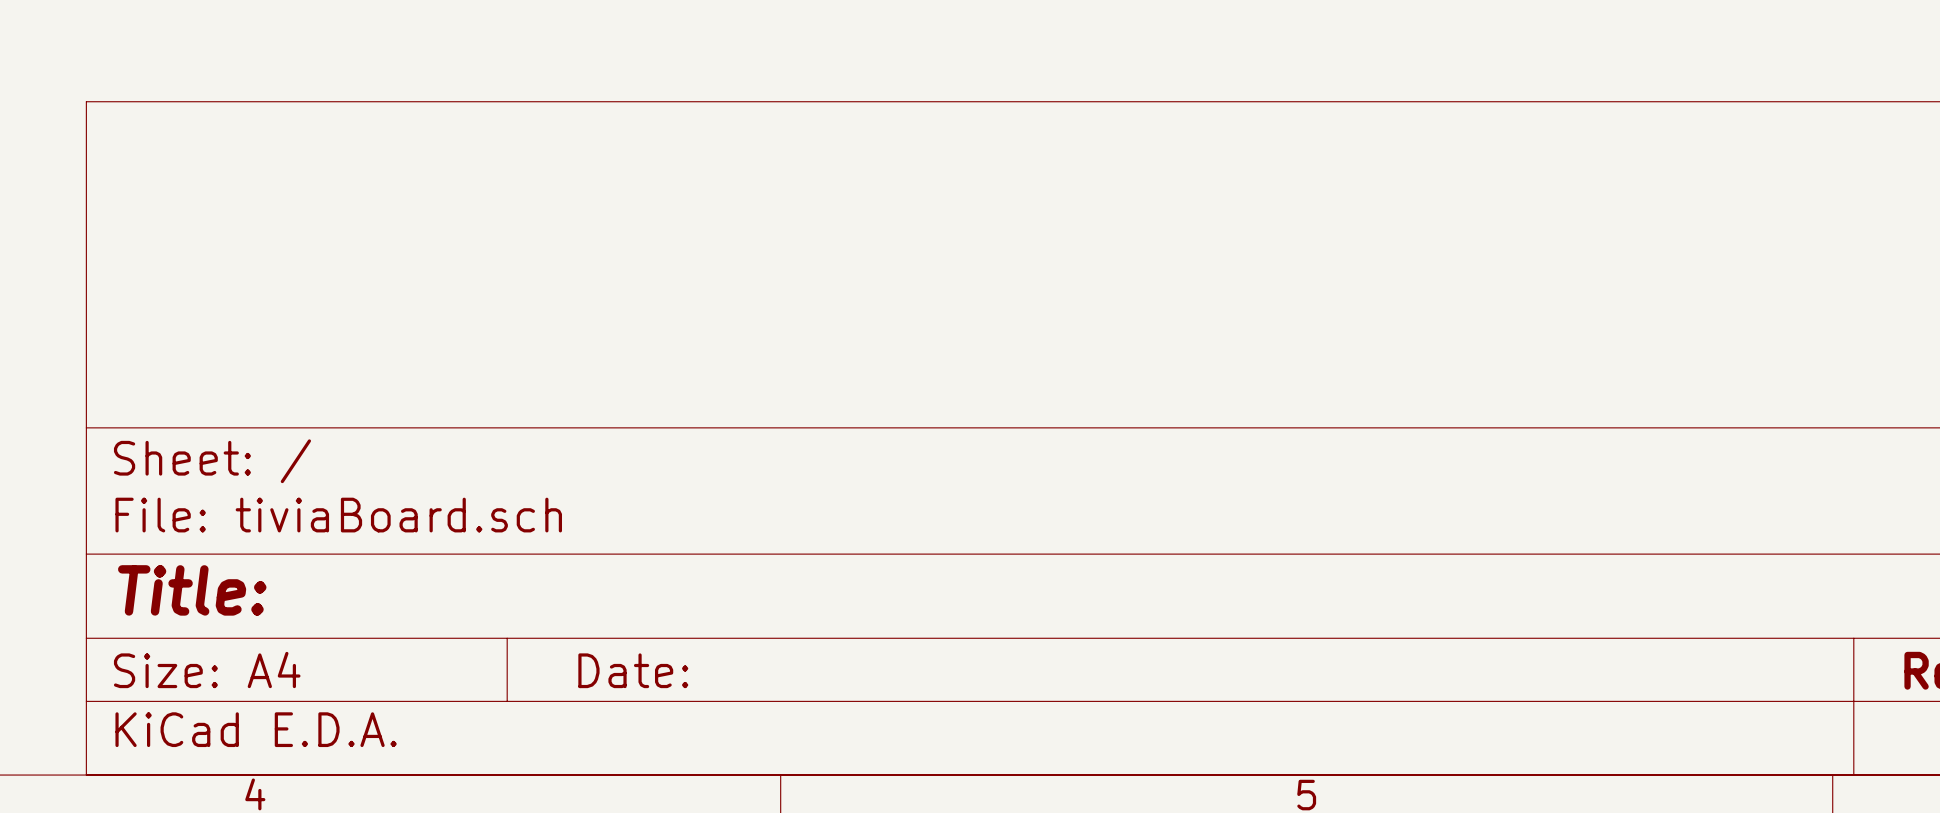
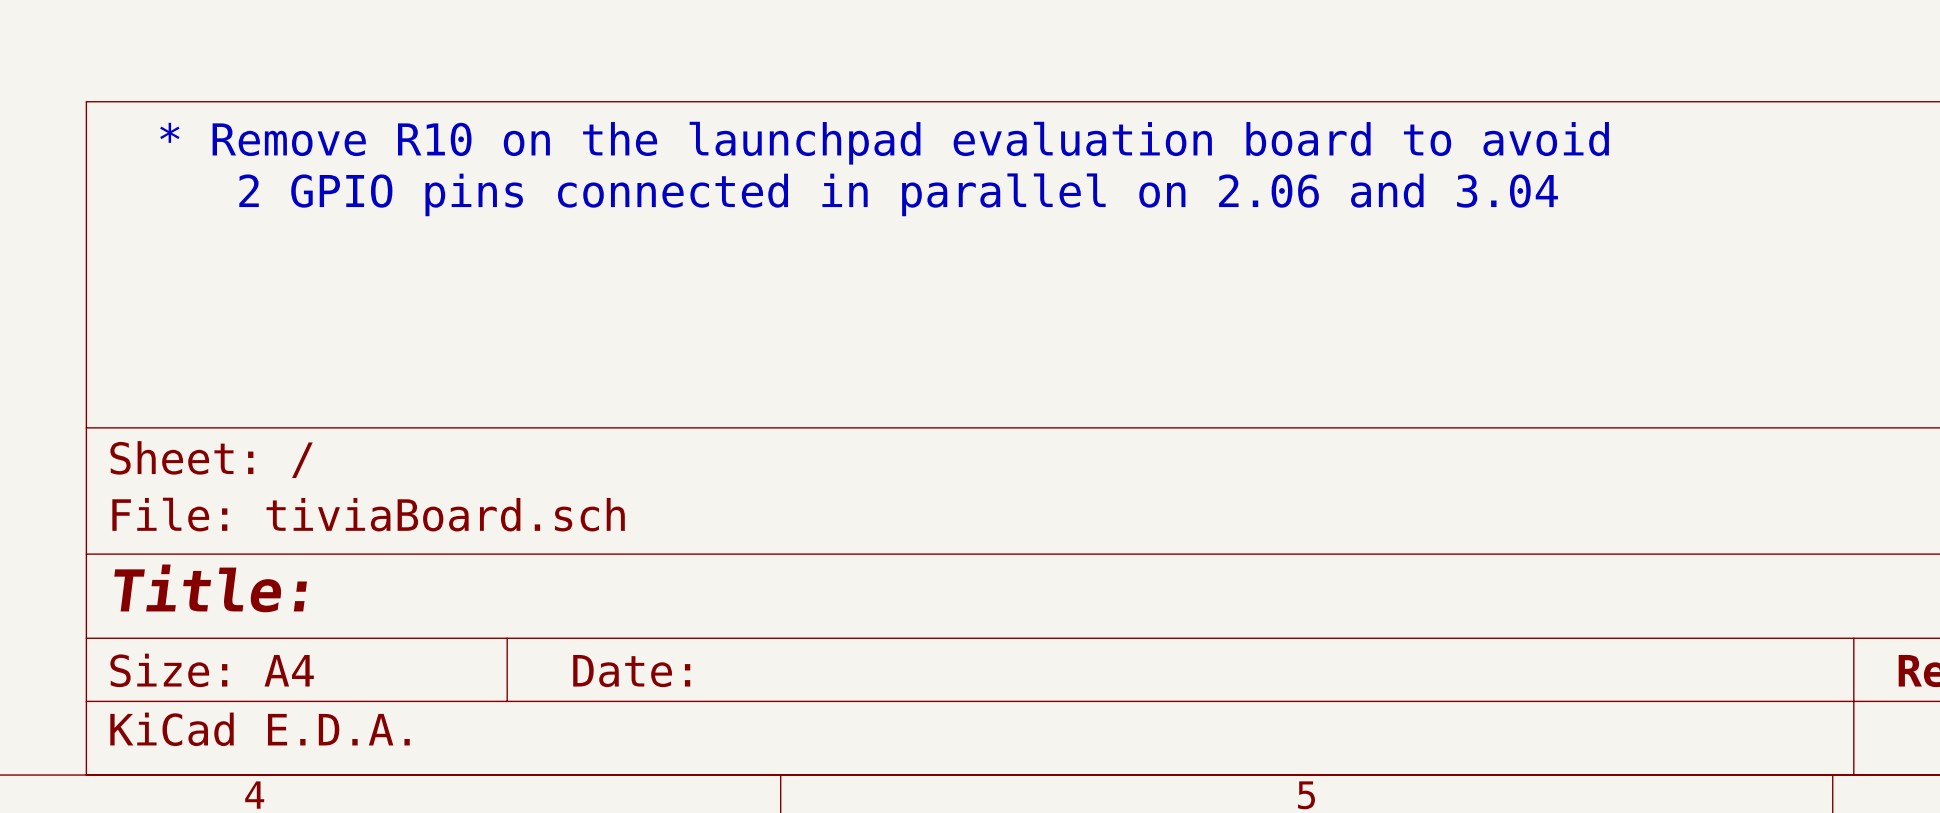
text: none -> * Remove R10 on the launchpad evaluation board to avoid (884, 143)
text: none -> 2 GPIO pins connected in parallel on 2.06 and 3.04 (898, 194)

